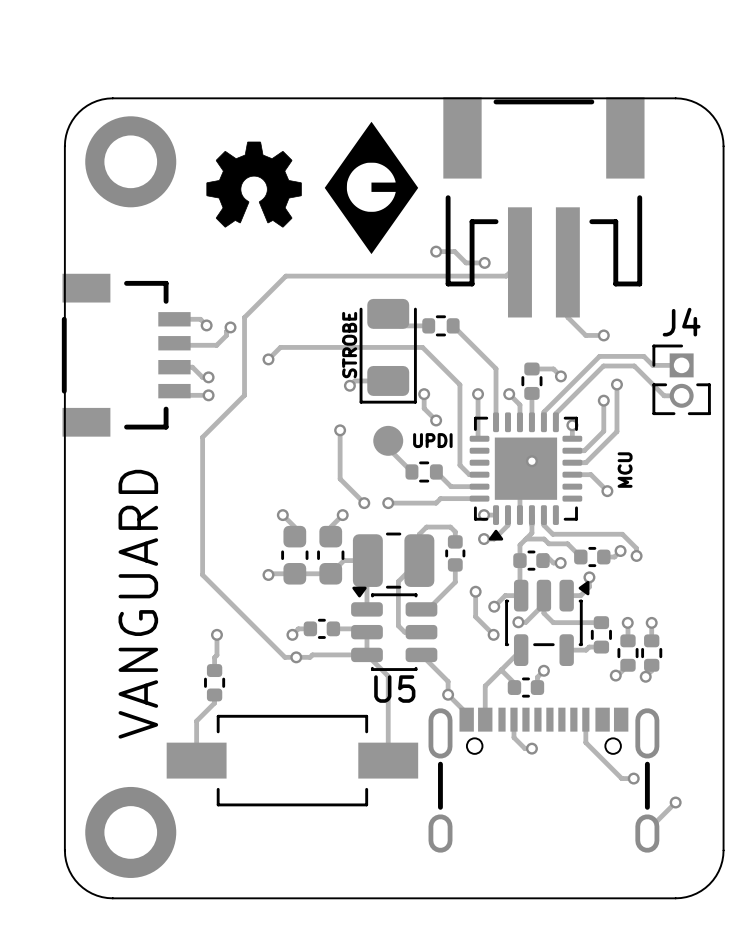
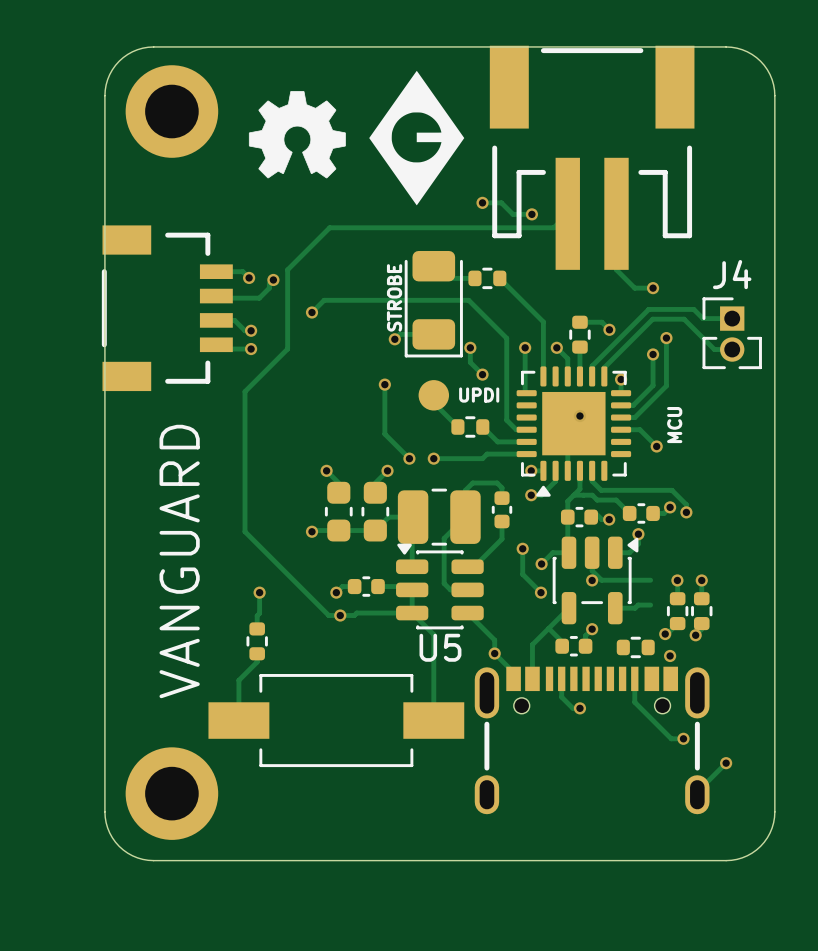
track: (543, 604) (525, 622) (518, 622) -> none
via position: (518, 622) -> (592, 580)
part rotation: 0° (601, 634) -> 90° clockwise (635, 647)
part position: (601, 634) -> (635, 647)
via: none -> (670, 655)

